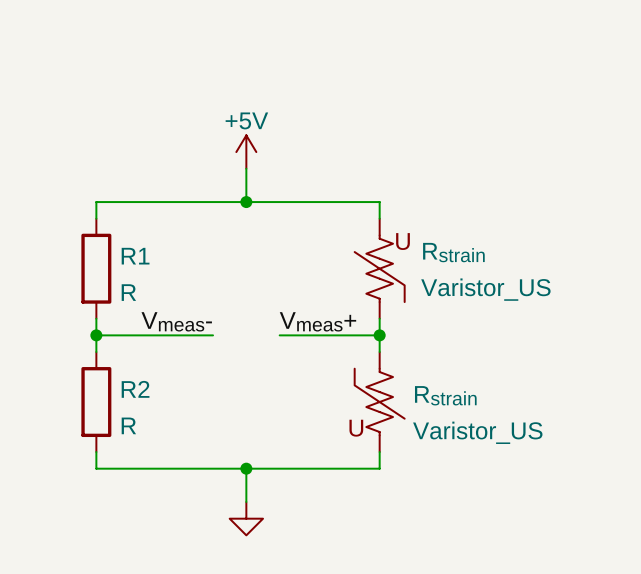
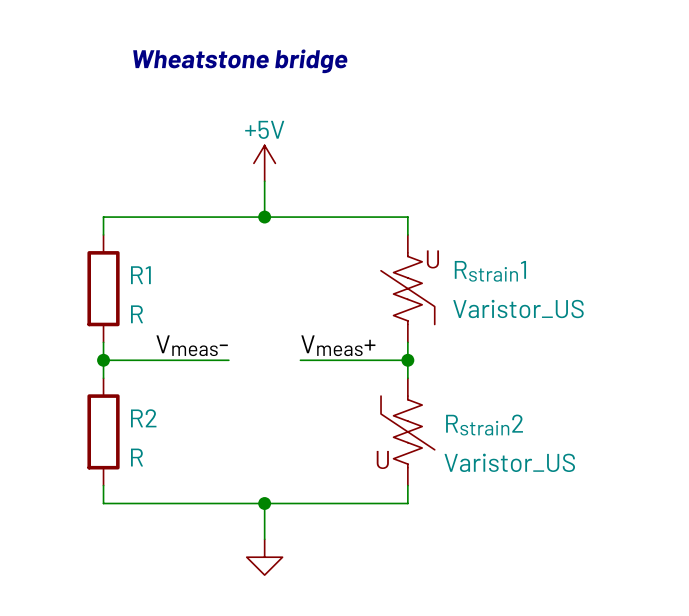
text: none -> Wheatstone bridge (240, 61)
Rstrain name: Rstrain (453, 252) -> Rstrain1 (490, 271)
Rstrain name: Rstrain (445, 395) -> Rstrain2 (484, 425)

